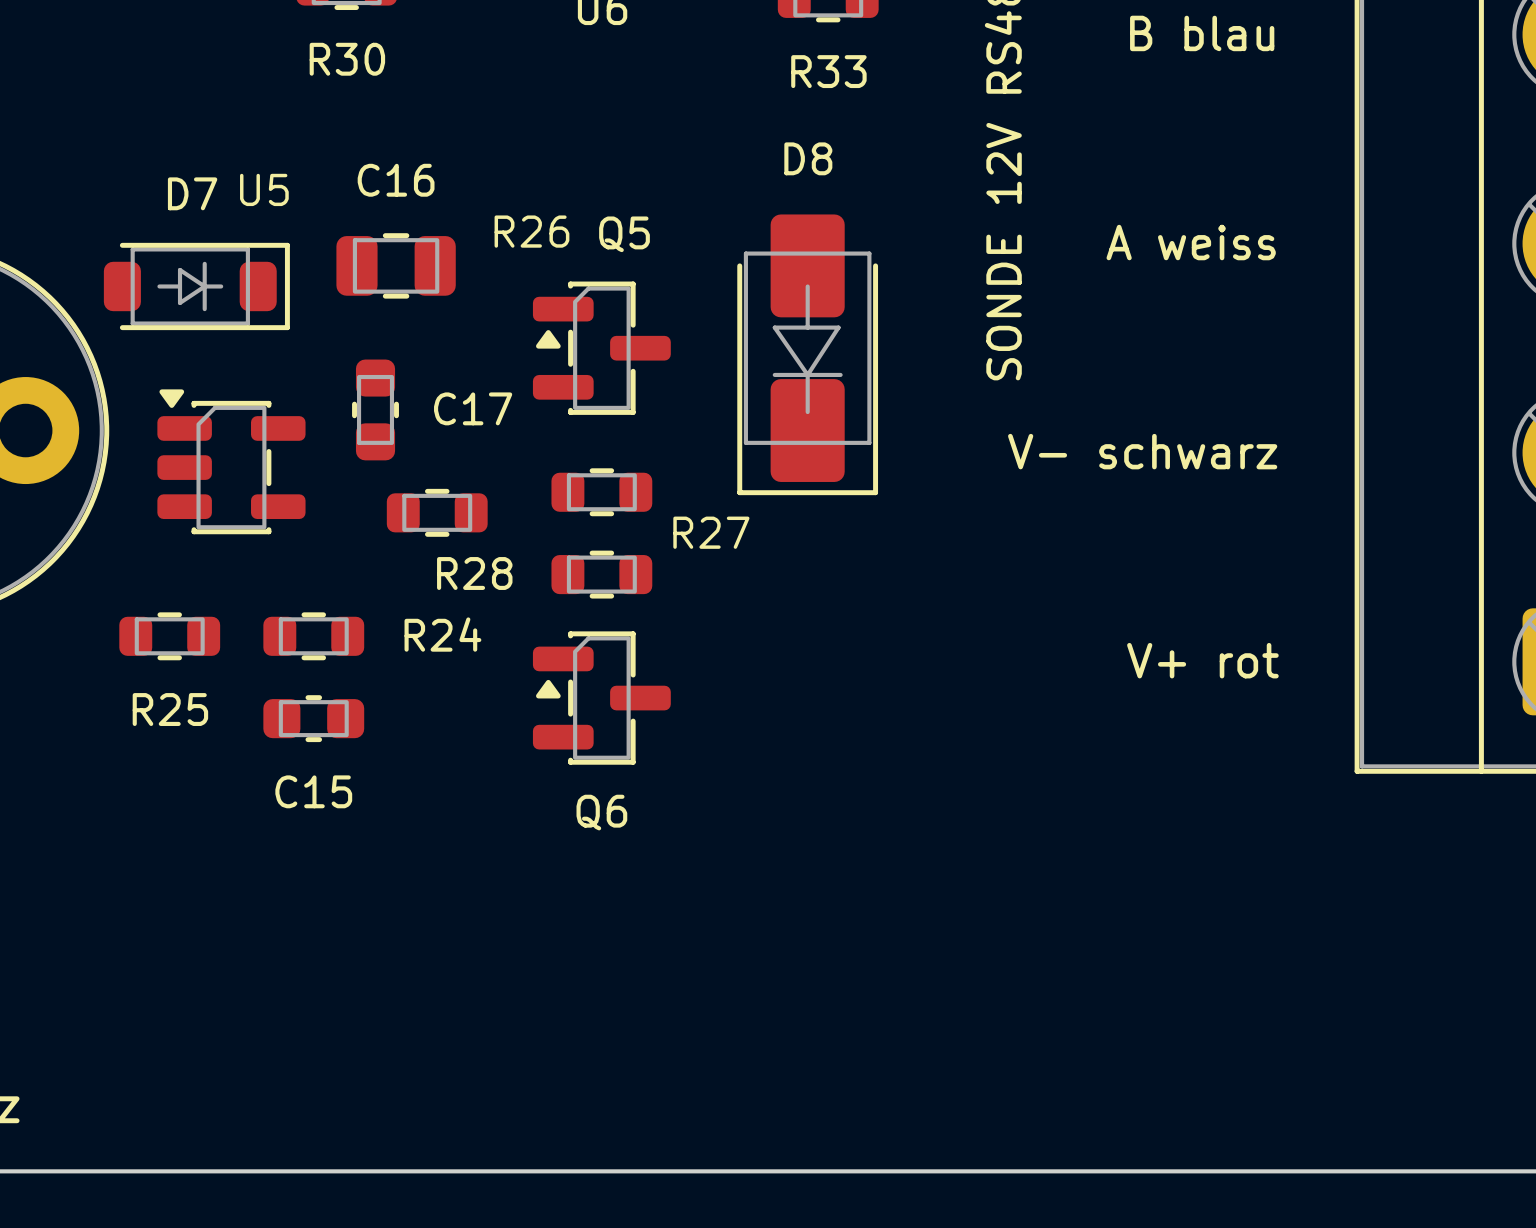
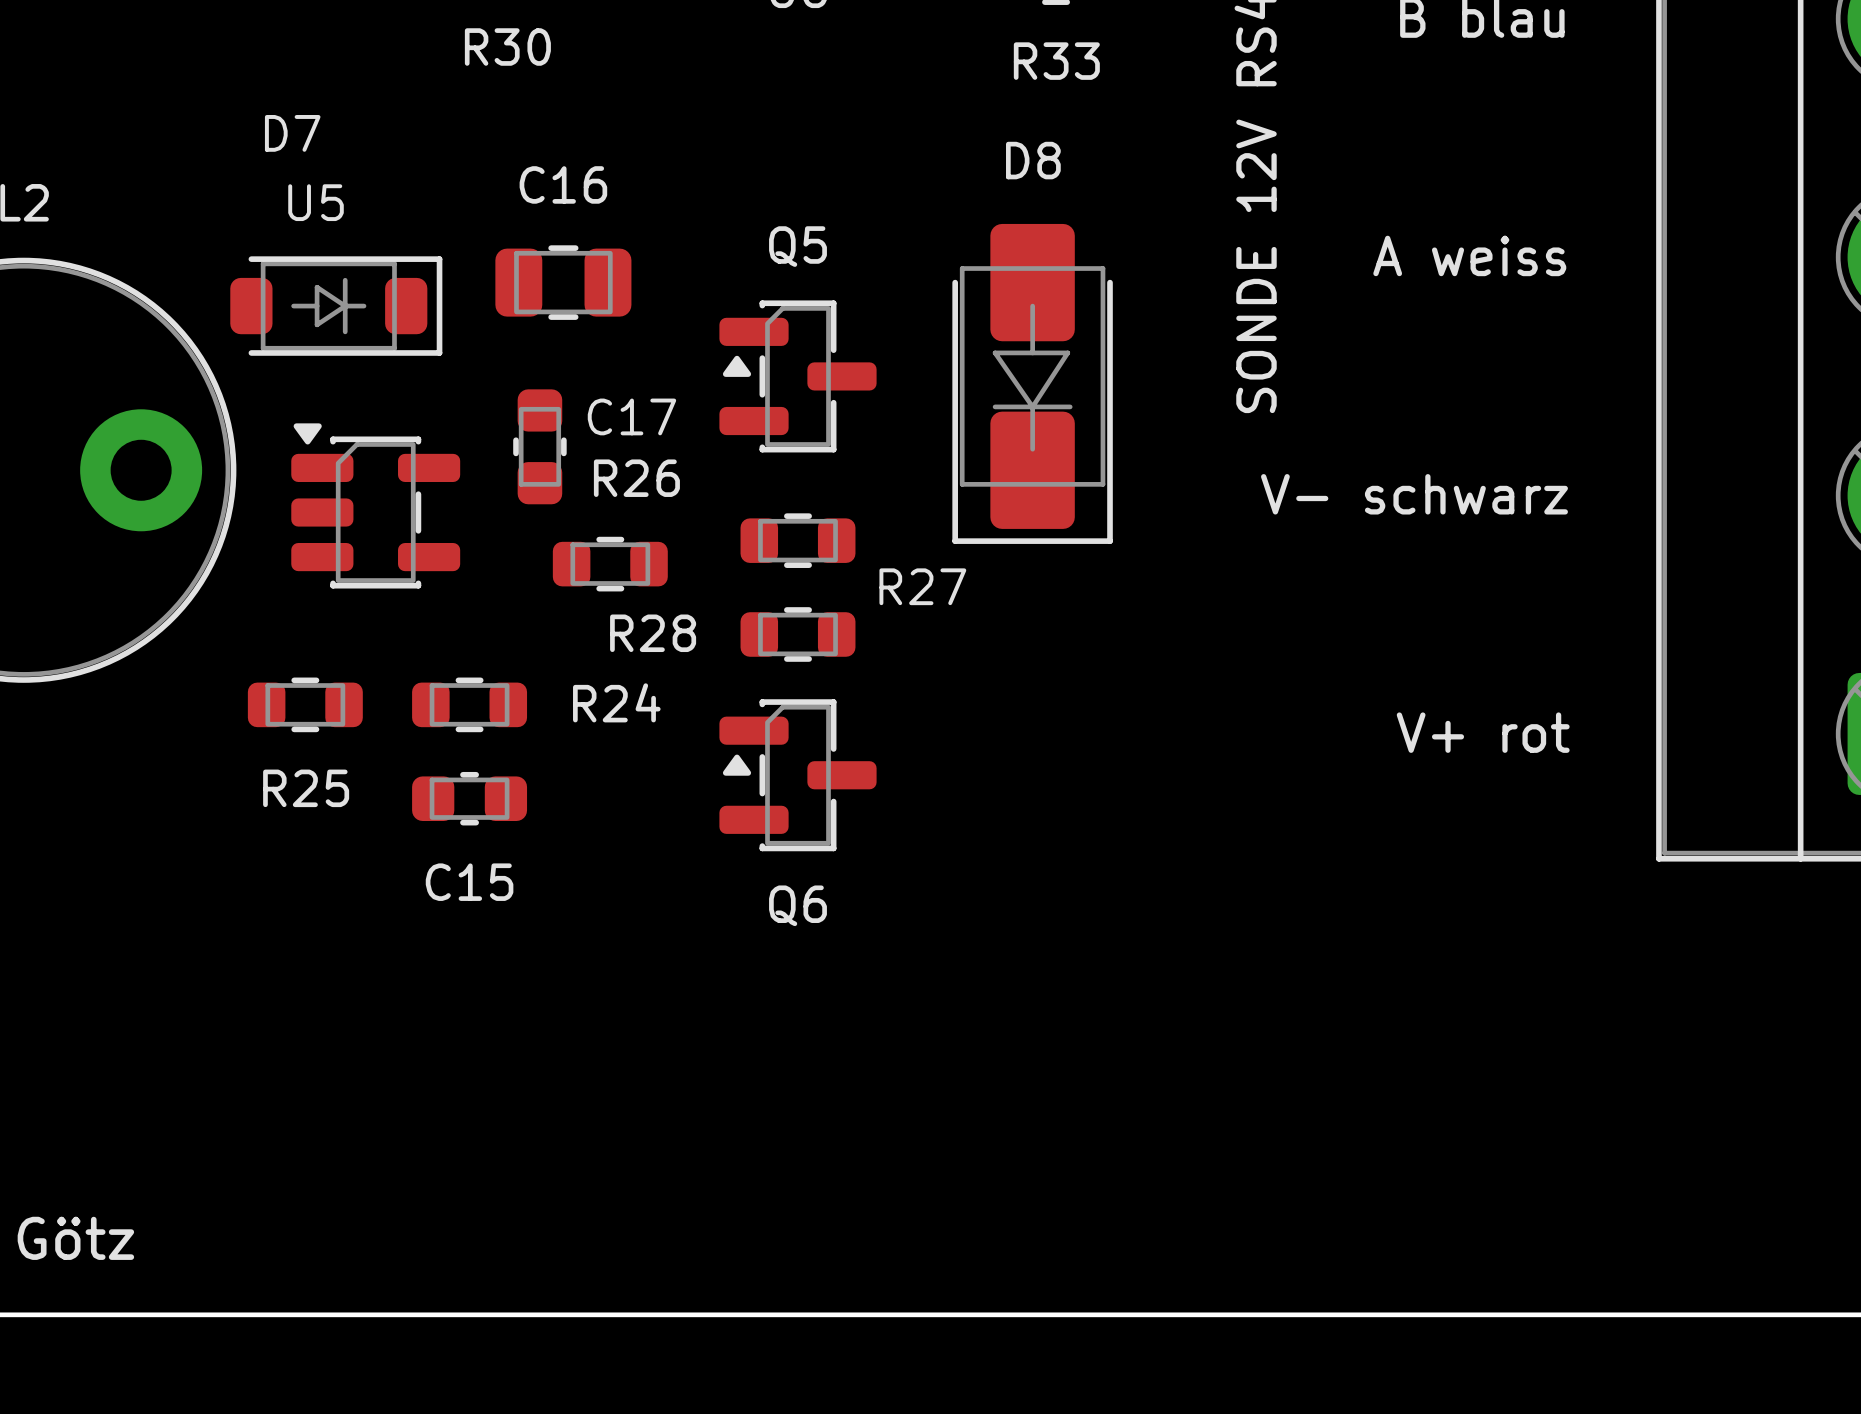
U5 name position: U5 (264, 189) -> U5 (316, 202)
D7 name position: D7 (192, 193) -> D7 (292, 133)
R26 name position: R26 (531, 231) -> R26 (636, 478)
Q5 name position: Q5 (624, 234) -> Q5 (797, 246)
C17 name position: C17 (473, 408) -> C17 (631, 416)

